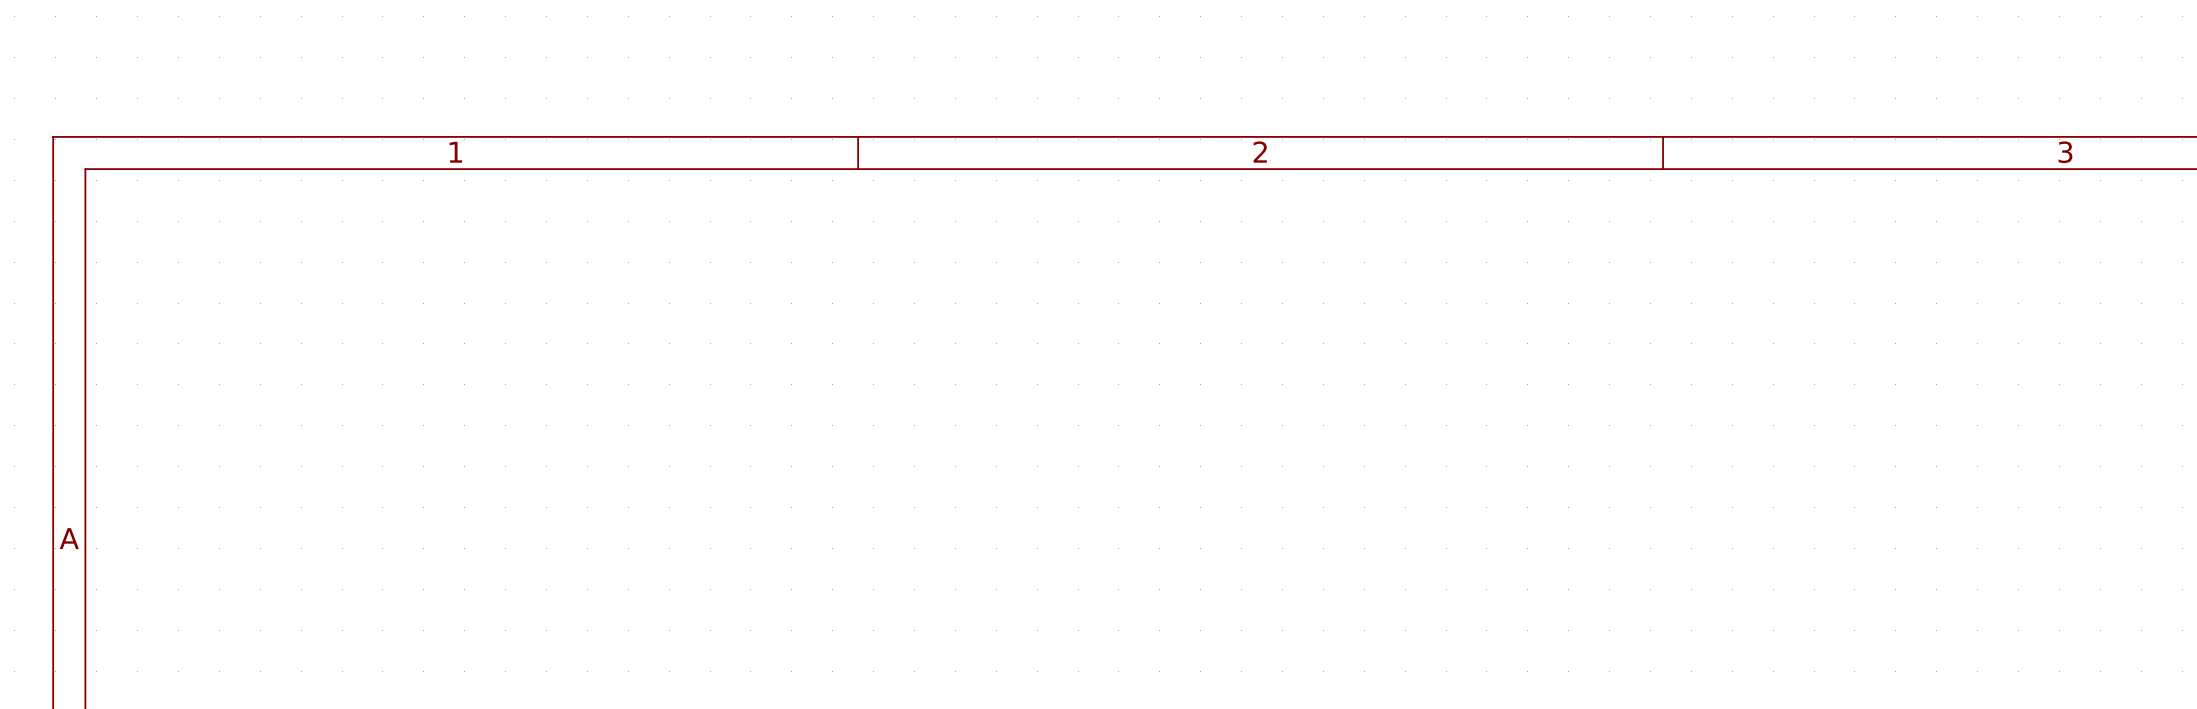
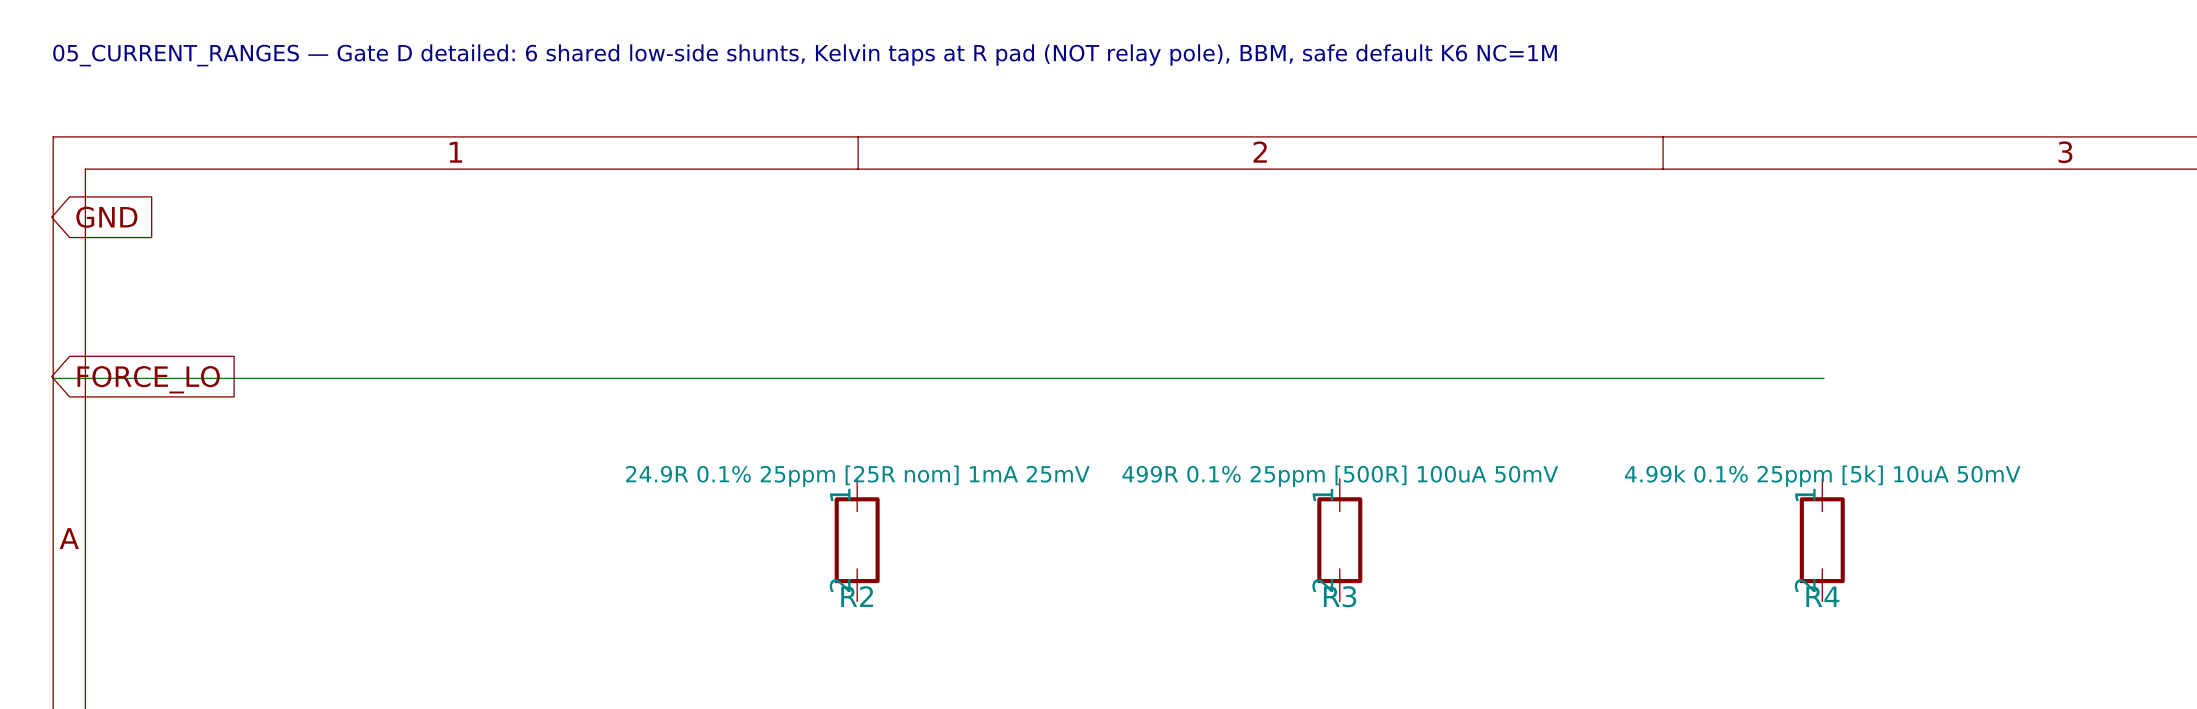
text: none -> 05_CURRENT_RANGES — Gate D detailed: 6 shared low-side shunts, Kelvin taps at R pad (NOT relay pole), BBM, safe default K6 NC=1M (805, 55)
global label: none -> GND (106, 217)
wire: none -> (53, 378) (1824, 378)
global label: none -> FORCE_LO (148, 379)
R2: none -> 24.9R 0.1% 25ppm [25R nom] 1mA 25mV (857, 540)
R3: none -> 499R 0.1% 25ppm [500R] 100uA 50mV (1339, 540)
R4: none -> 4.99k 0.1% 25ppm [5k] 10uA 50mV (1822, 540)

